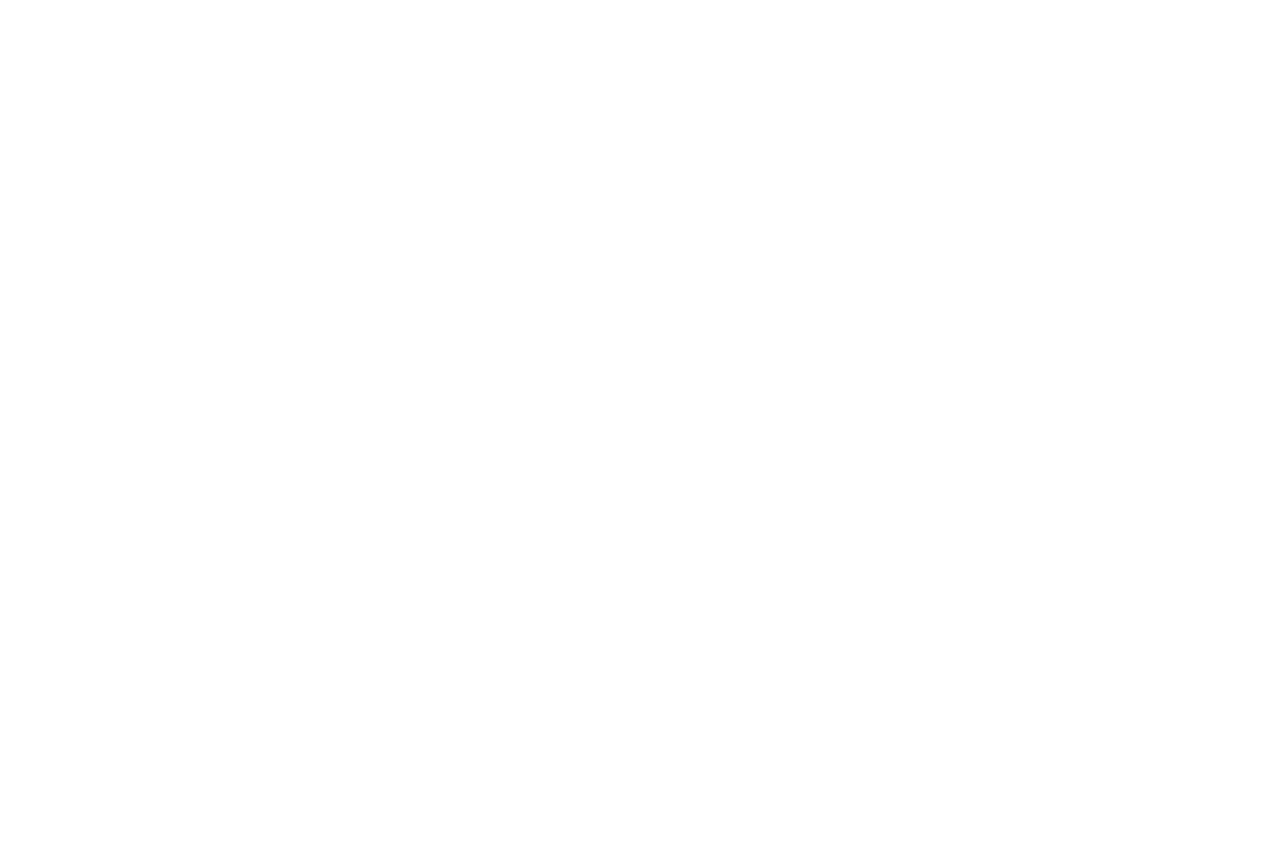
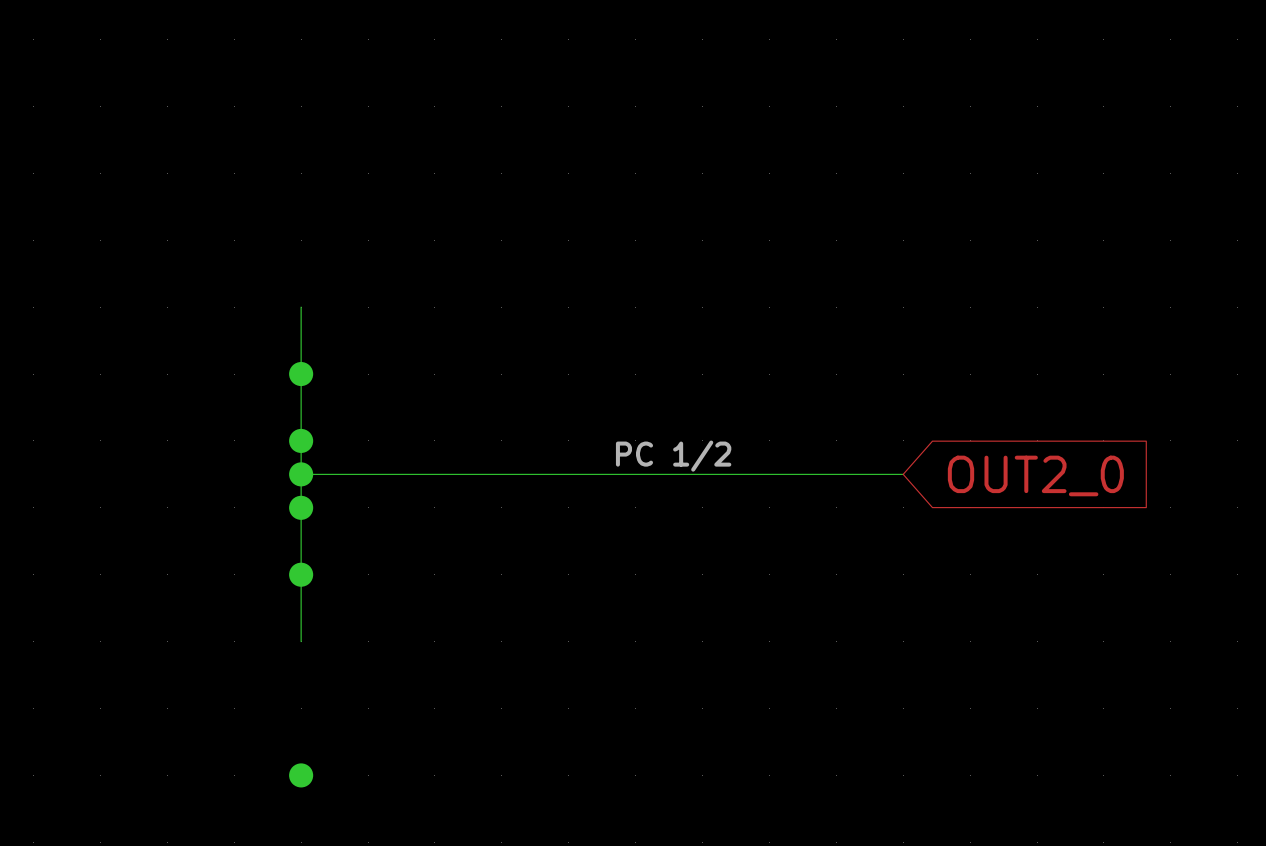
wire: none -> (301, 307) (301, 641)
junction: none -> (301, 374)
junction: none -> (301, 440)
label: none -> PC 1/2 (673, 456)
wire: none -> (301, 474) (903, 474)
junction: none -> (301, 474)
global label: none -> OUT2_0 (1035, 475)
junction: none -> (301, 507)
junction: none -> (301, 574)
junction: none -> (301, 775)

